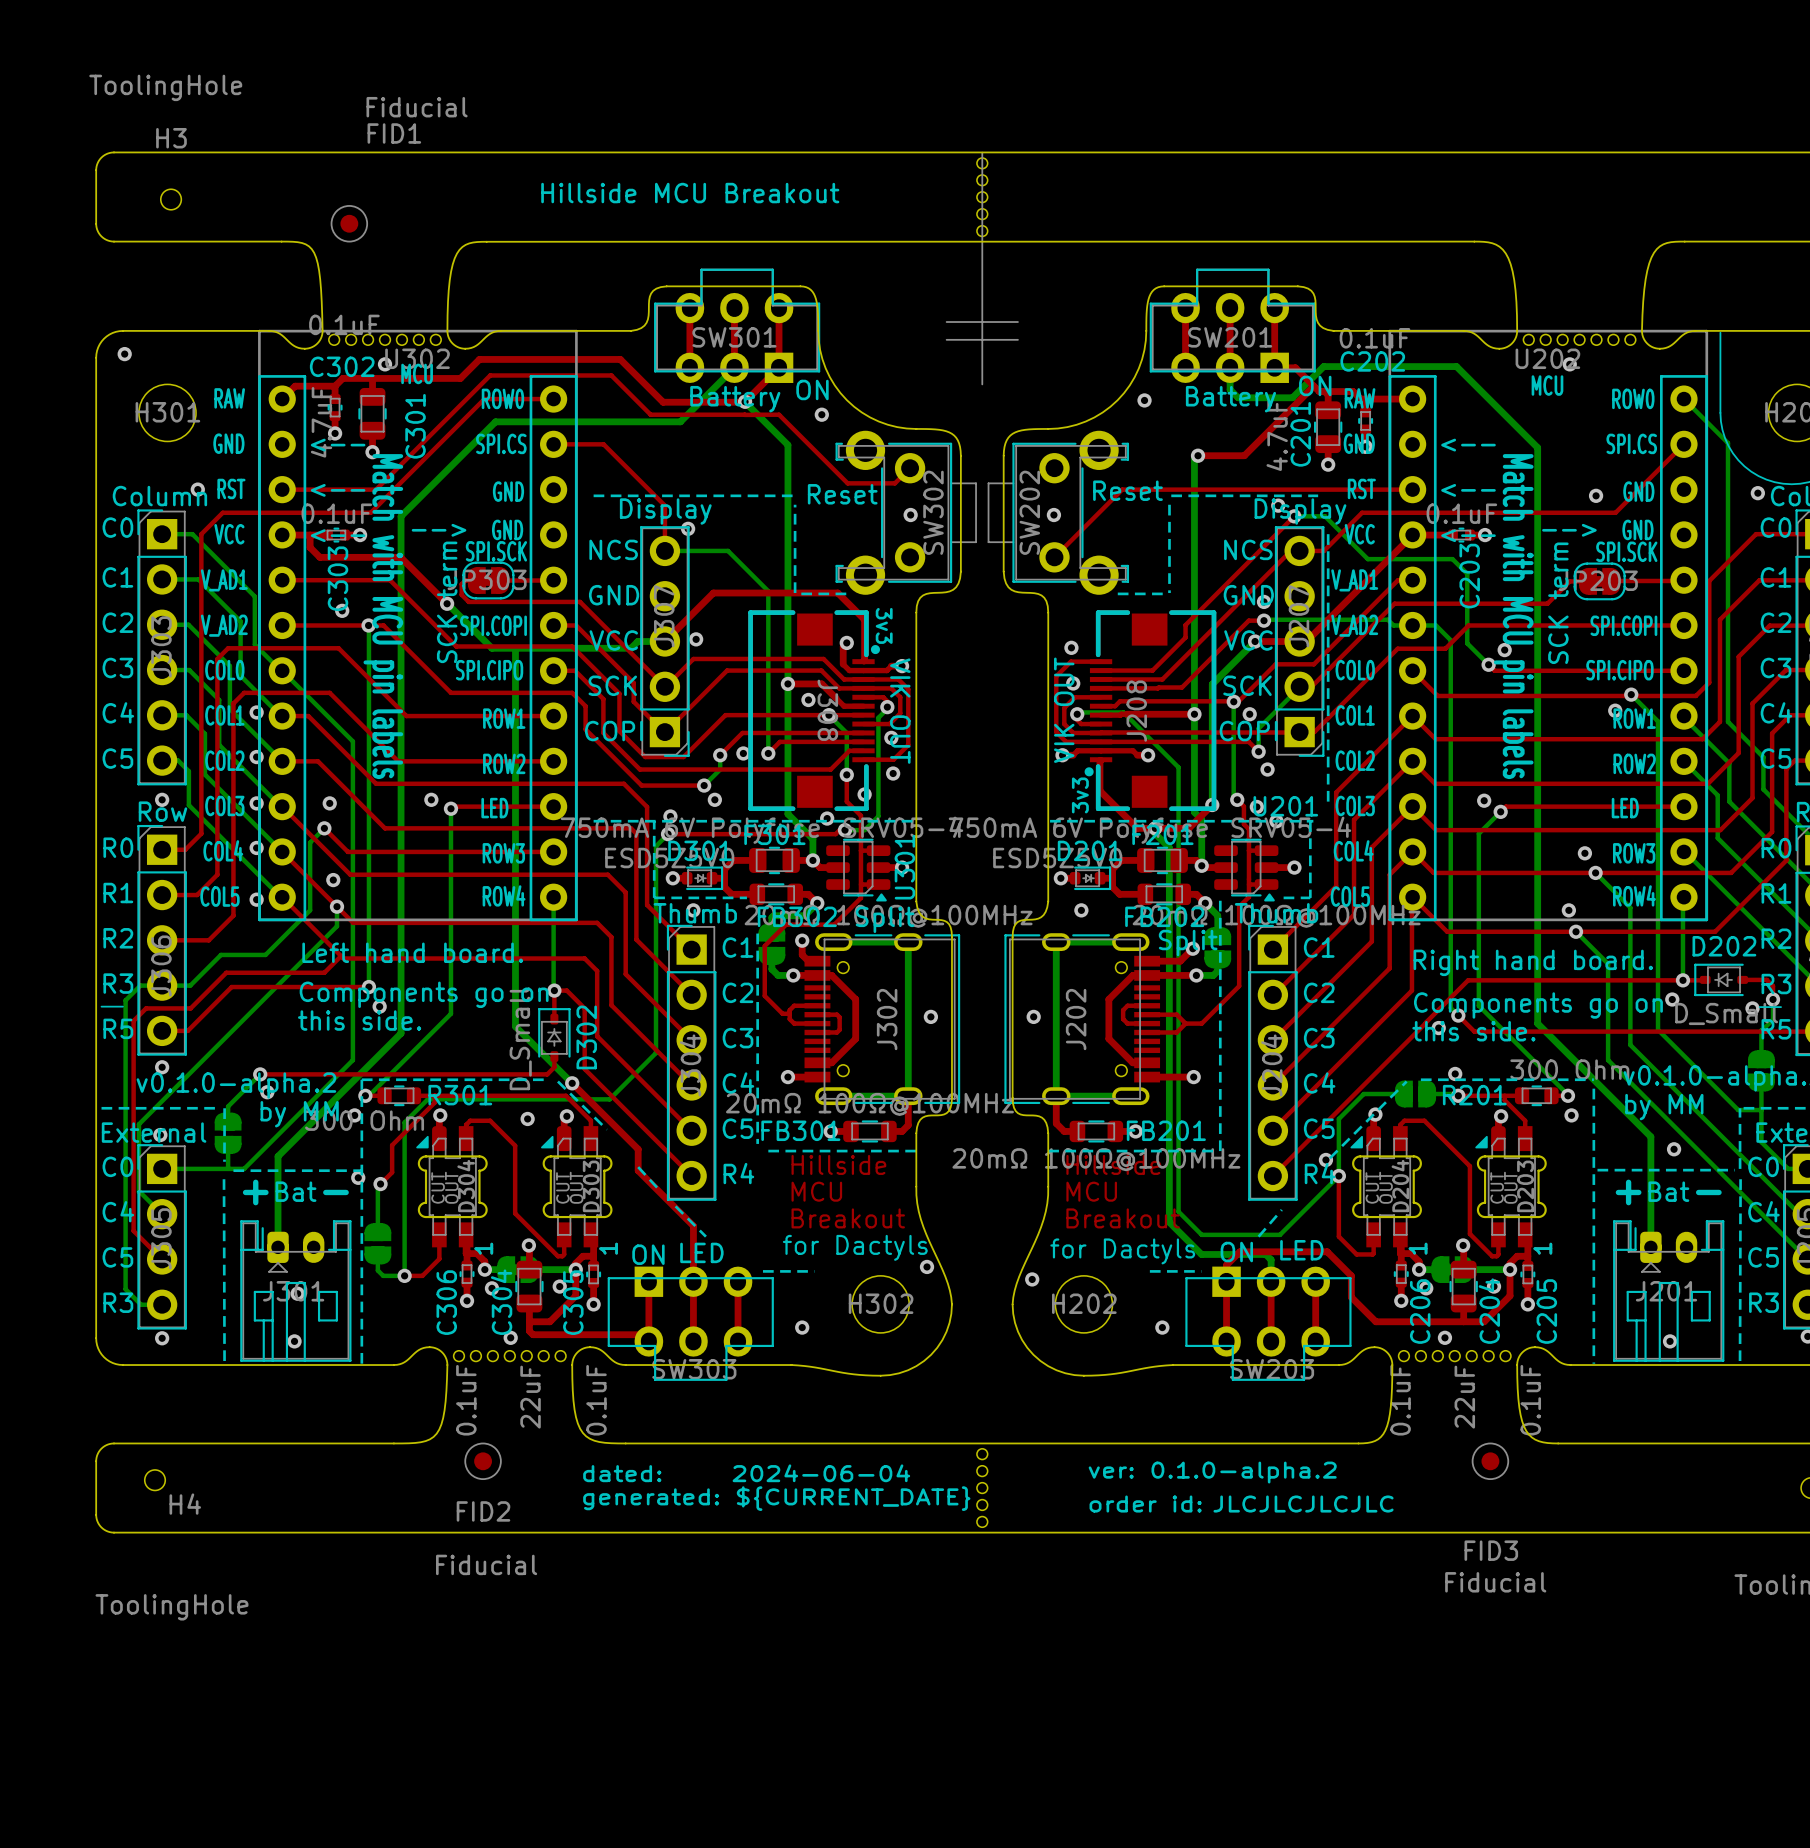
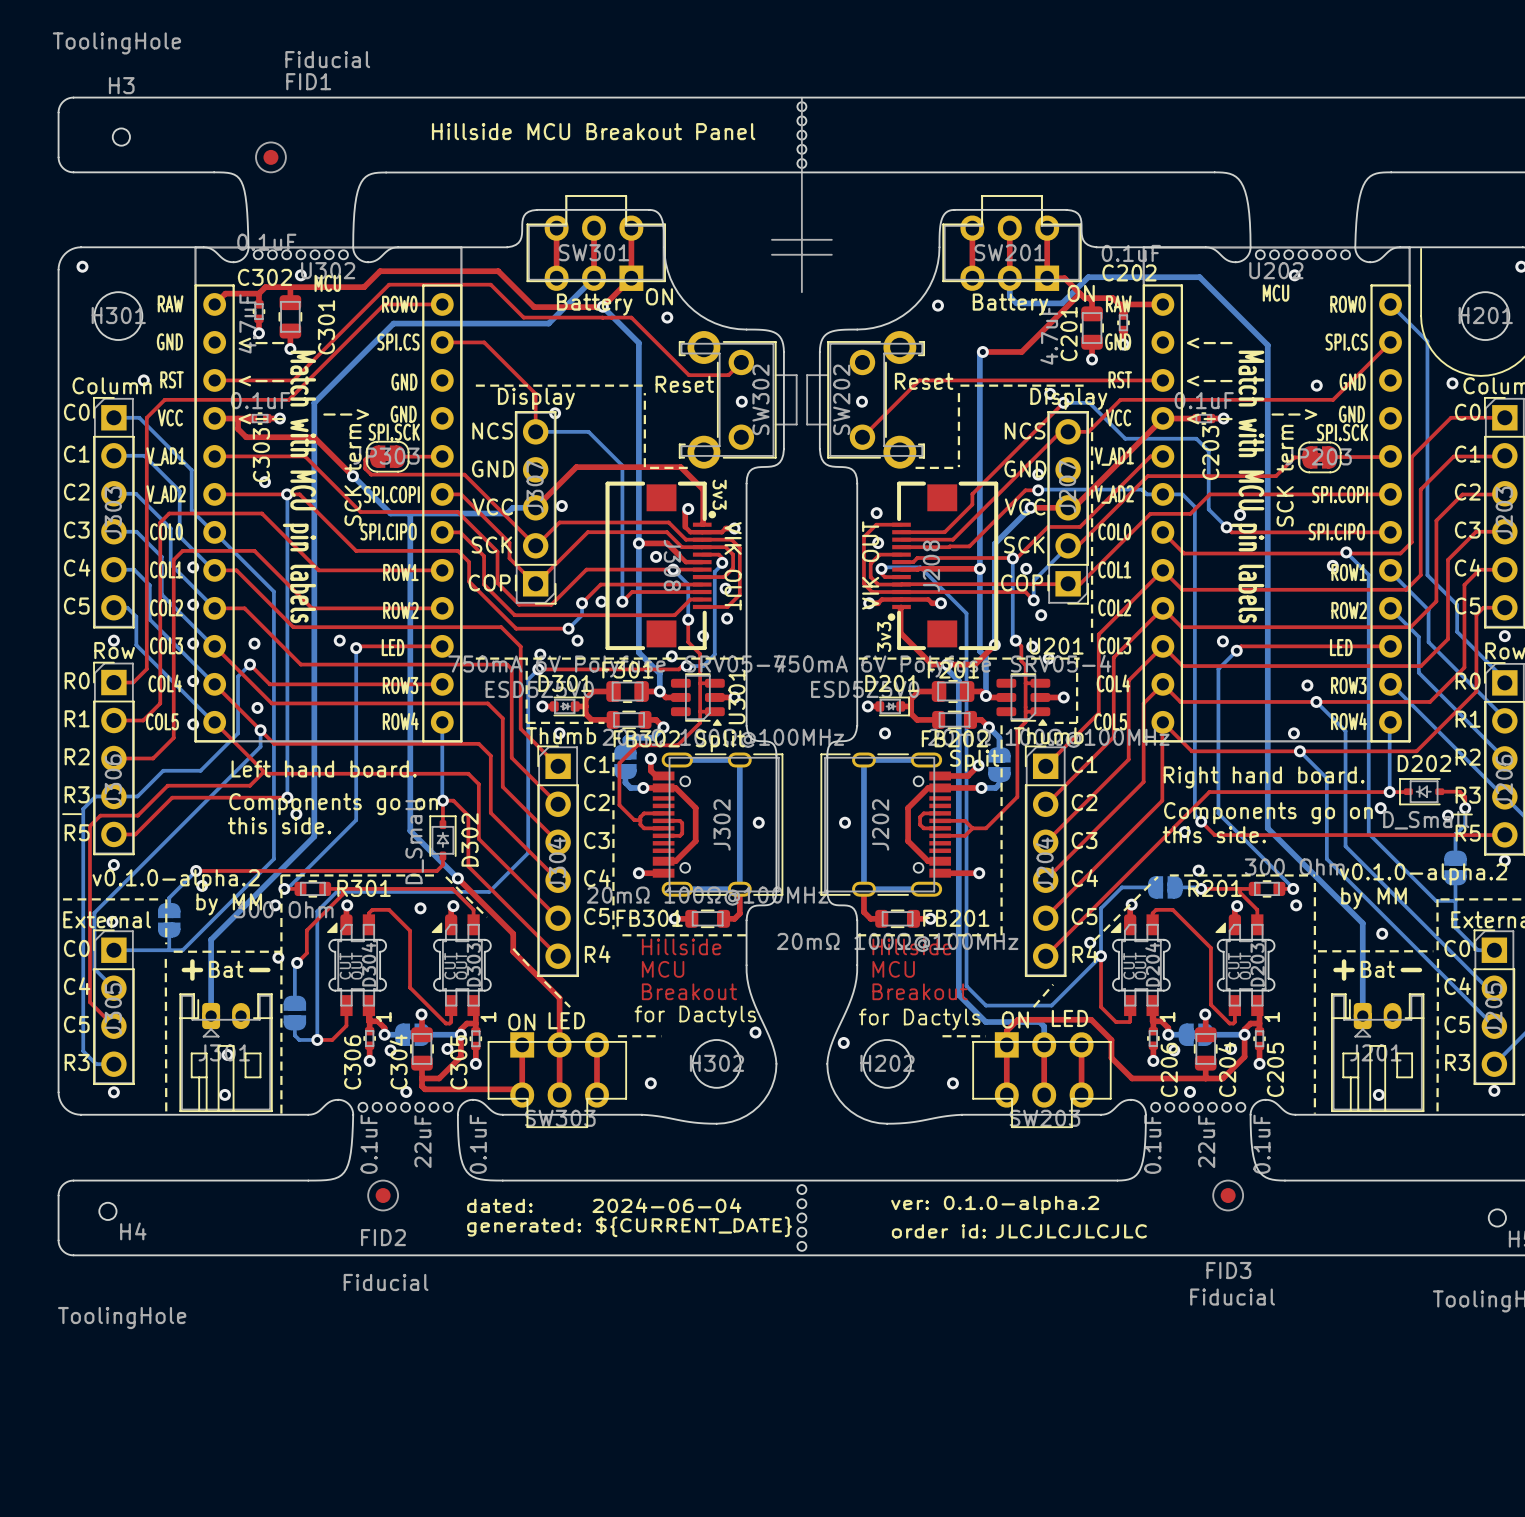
text: Hillside MCU Breakout (690, 193) -> Hillside MCU Breakout Panel (593, 131)

